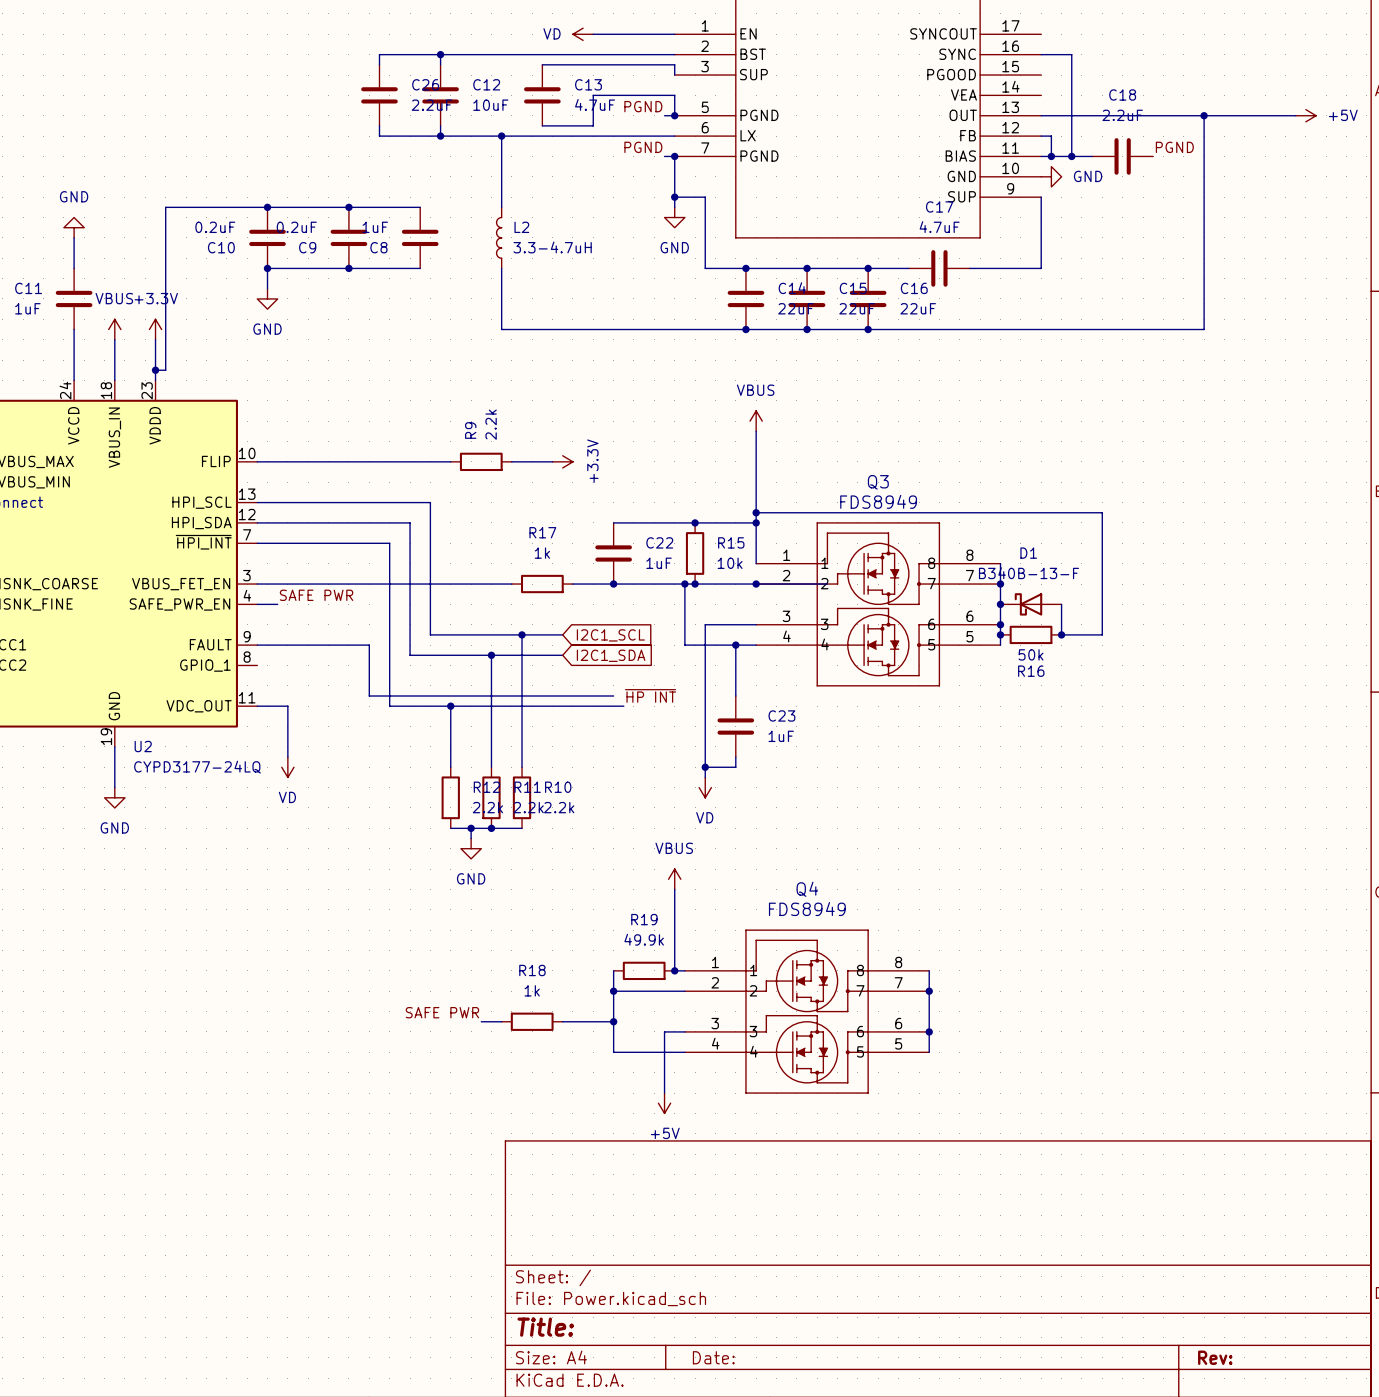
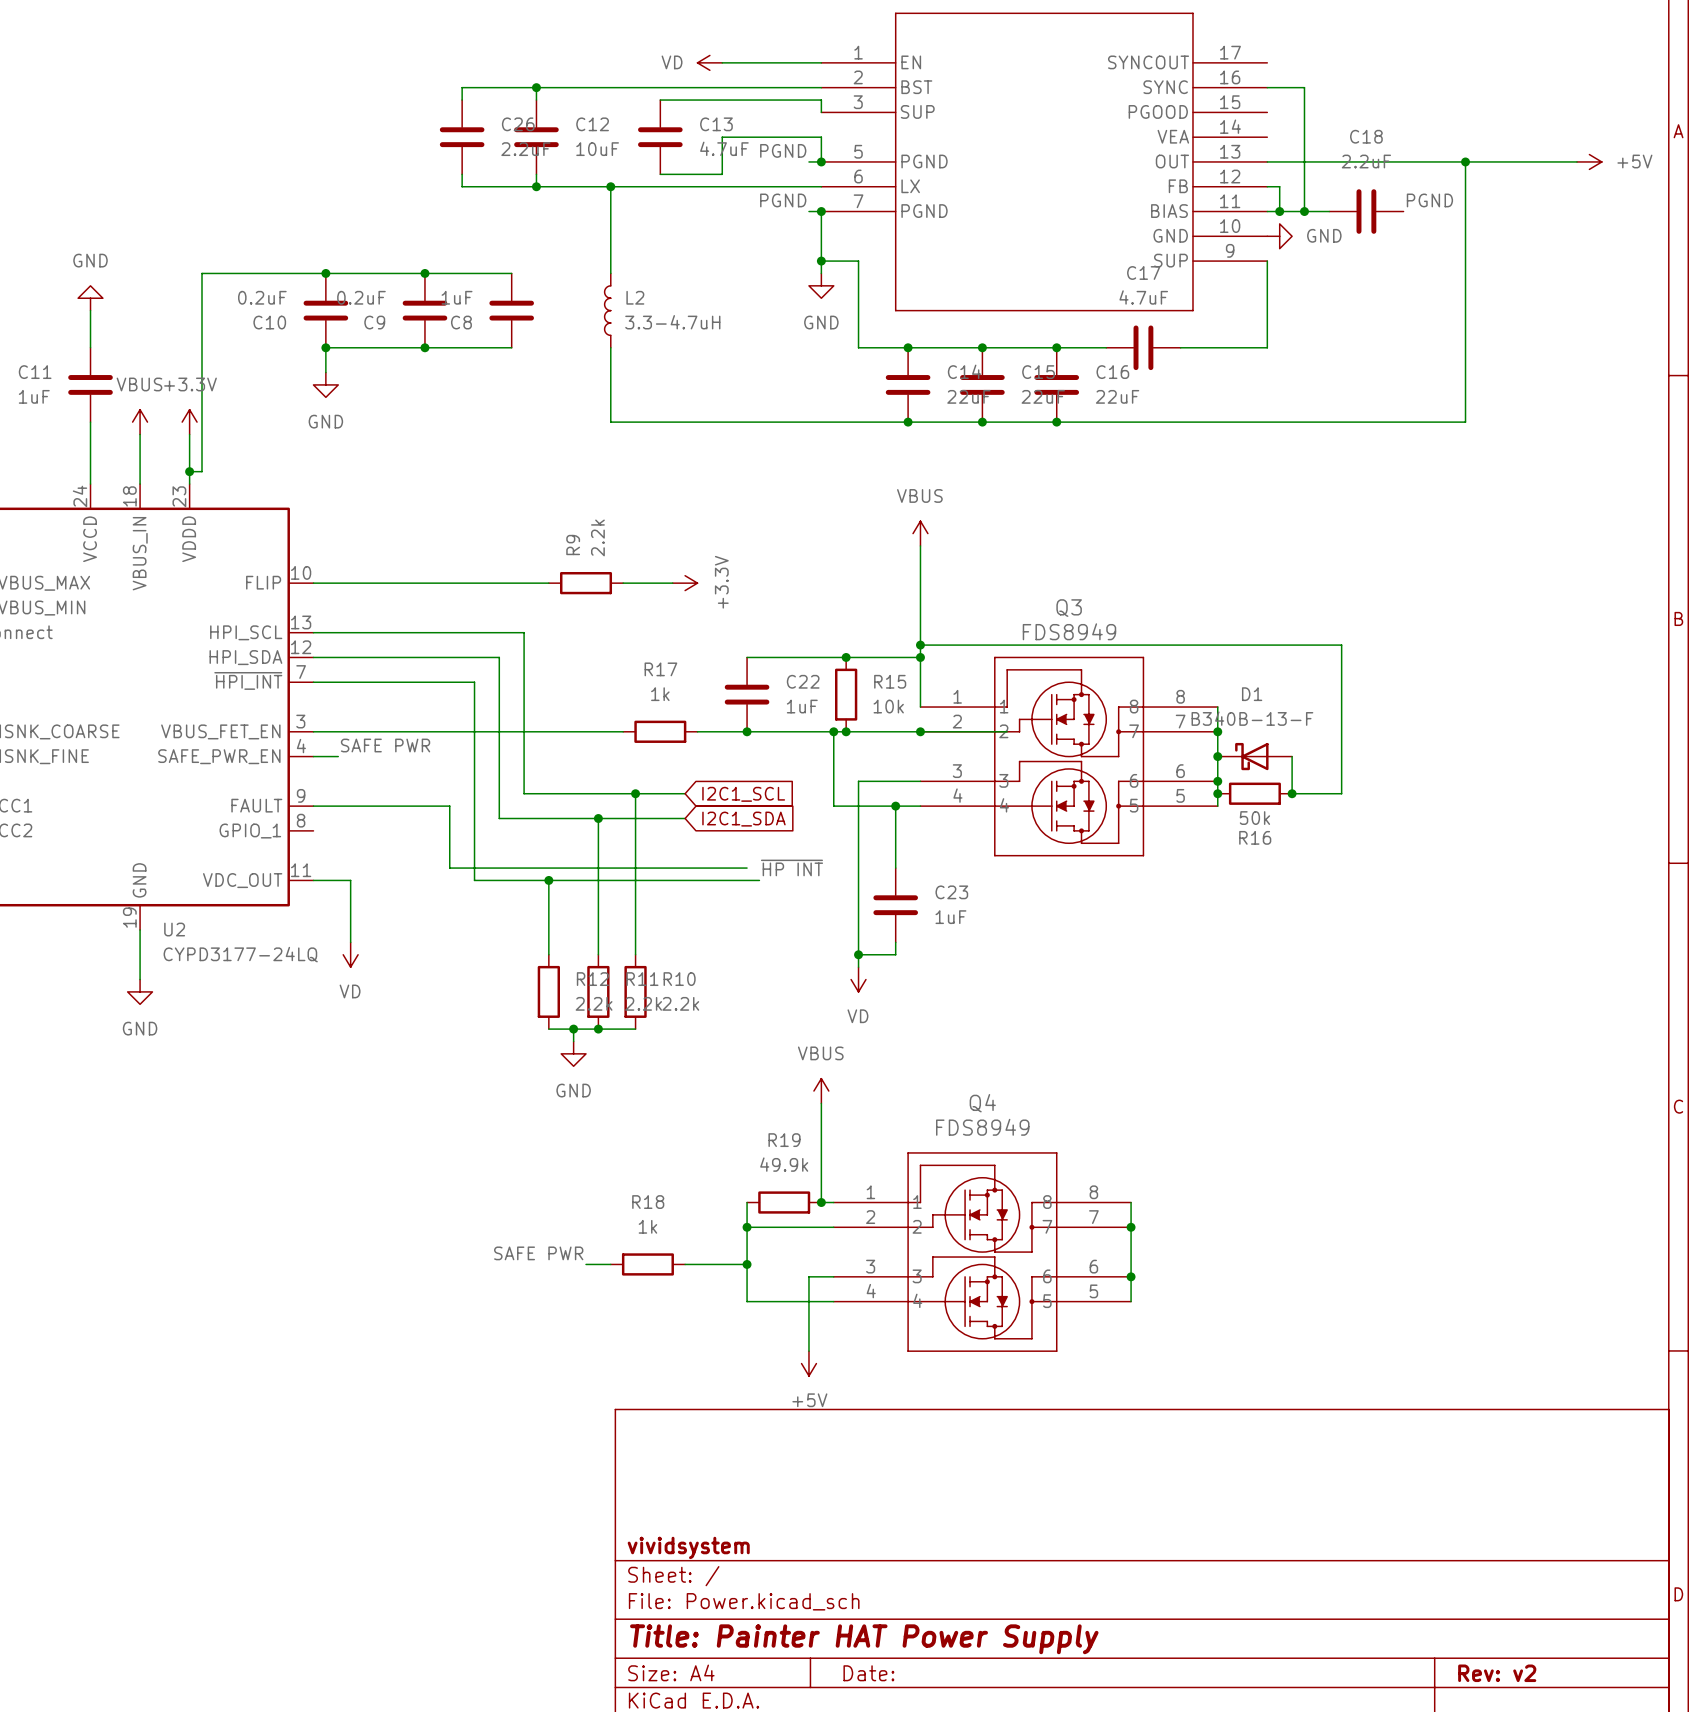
title block: none -> vividsystem (688, 1547)
title block: Title: (545, 1327) -> Title: Painter HAT Power Supply (864, 1639)
title block: Rev: (1215, 1357) -> Rev: v2 (1497, 1673)

